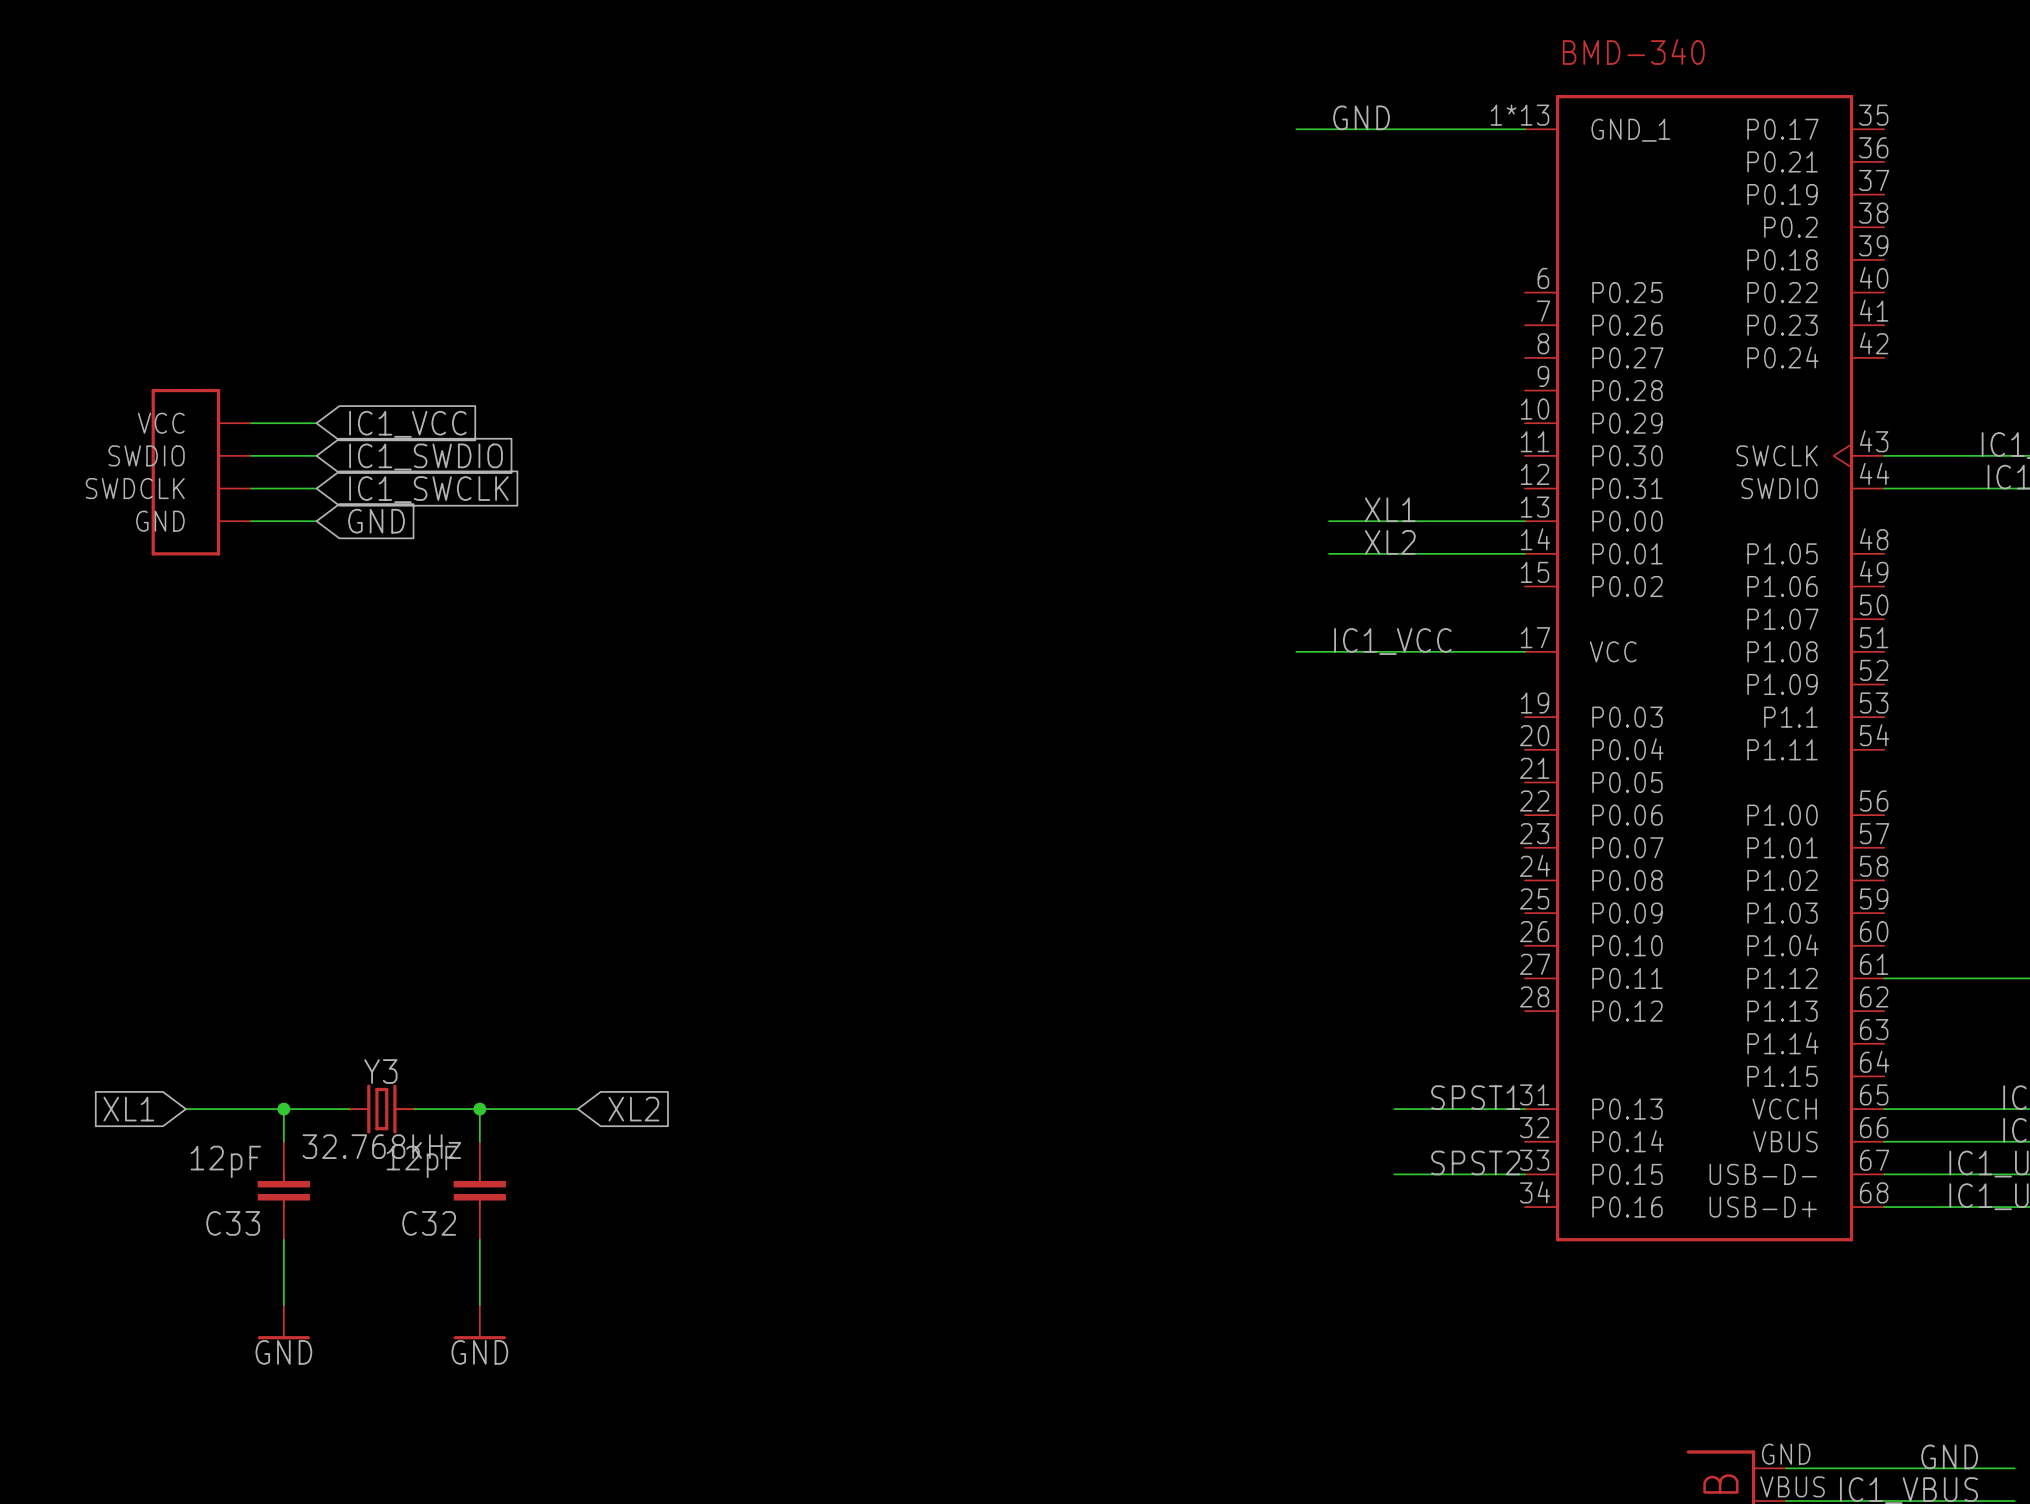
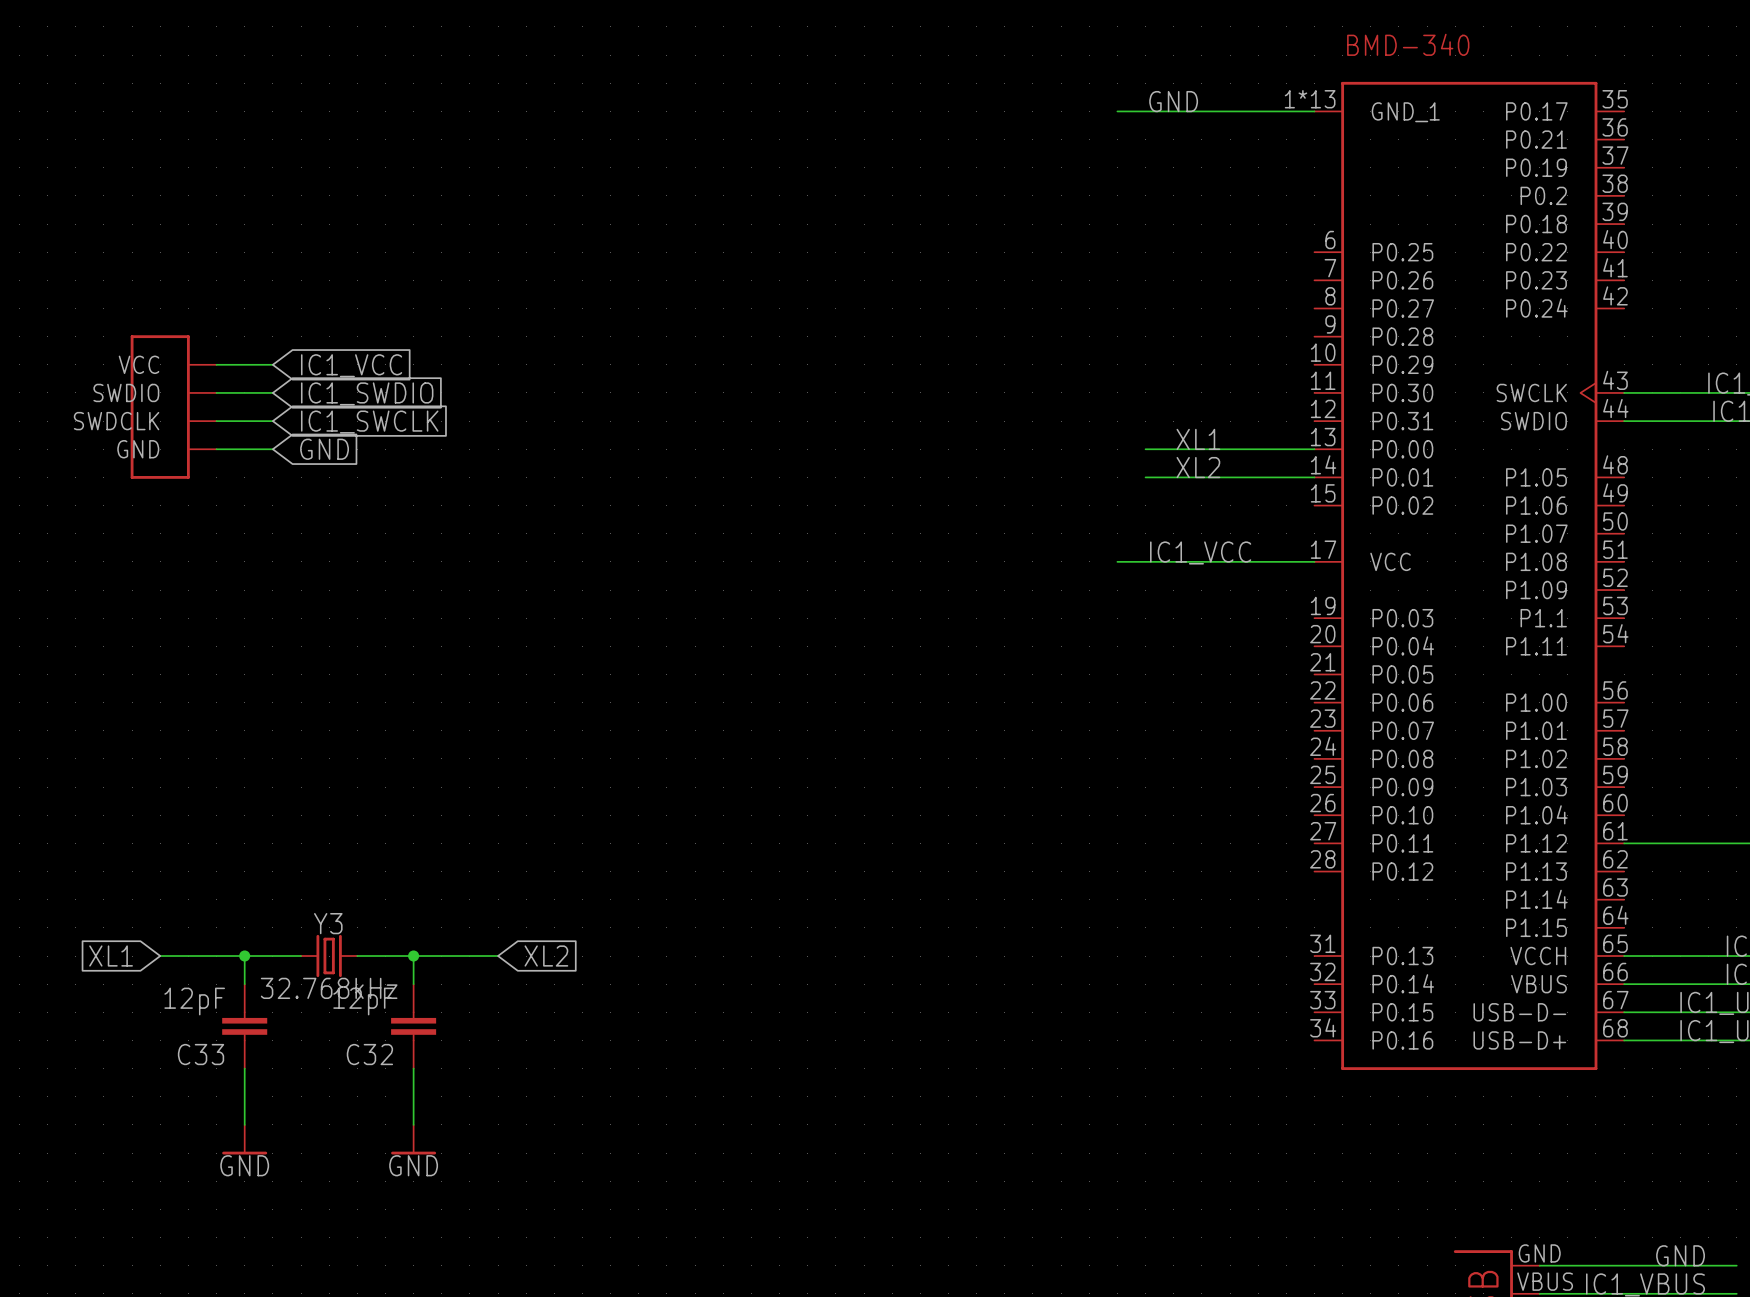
label: SPST1 (1475, 1097) -> none
wire: (1394, 1109) (1524, 1109) -> none
label: SPST2 (1475, 1162) -> none
wire: (1394, 1174) (1524, 1174) -> none

